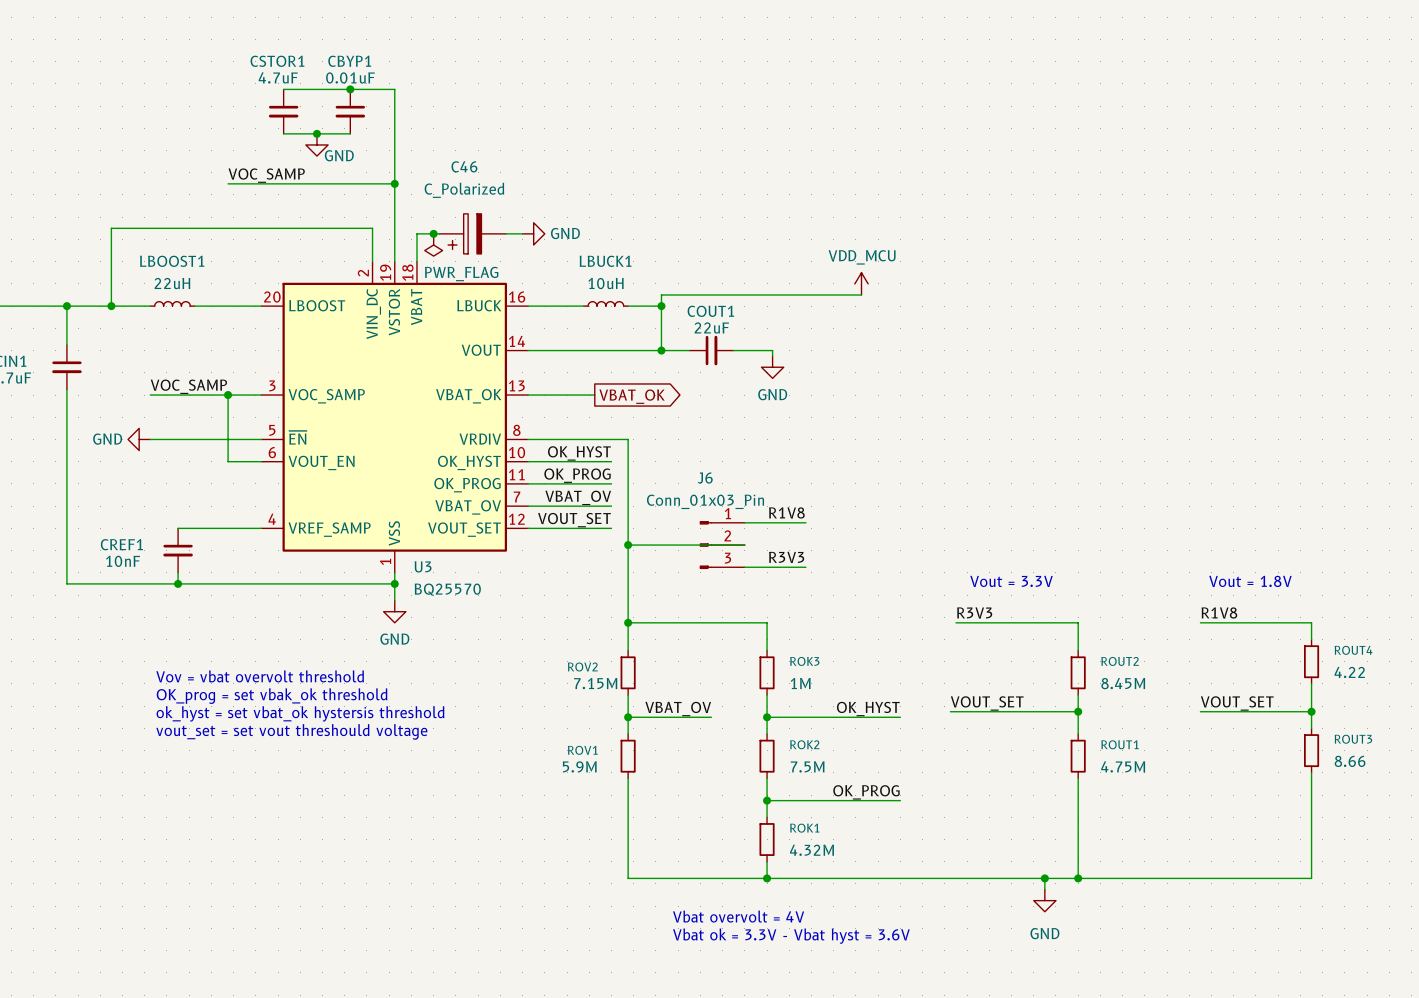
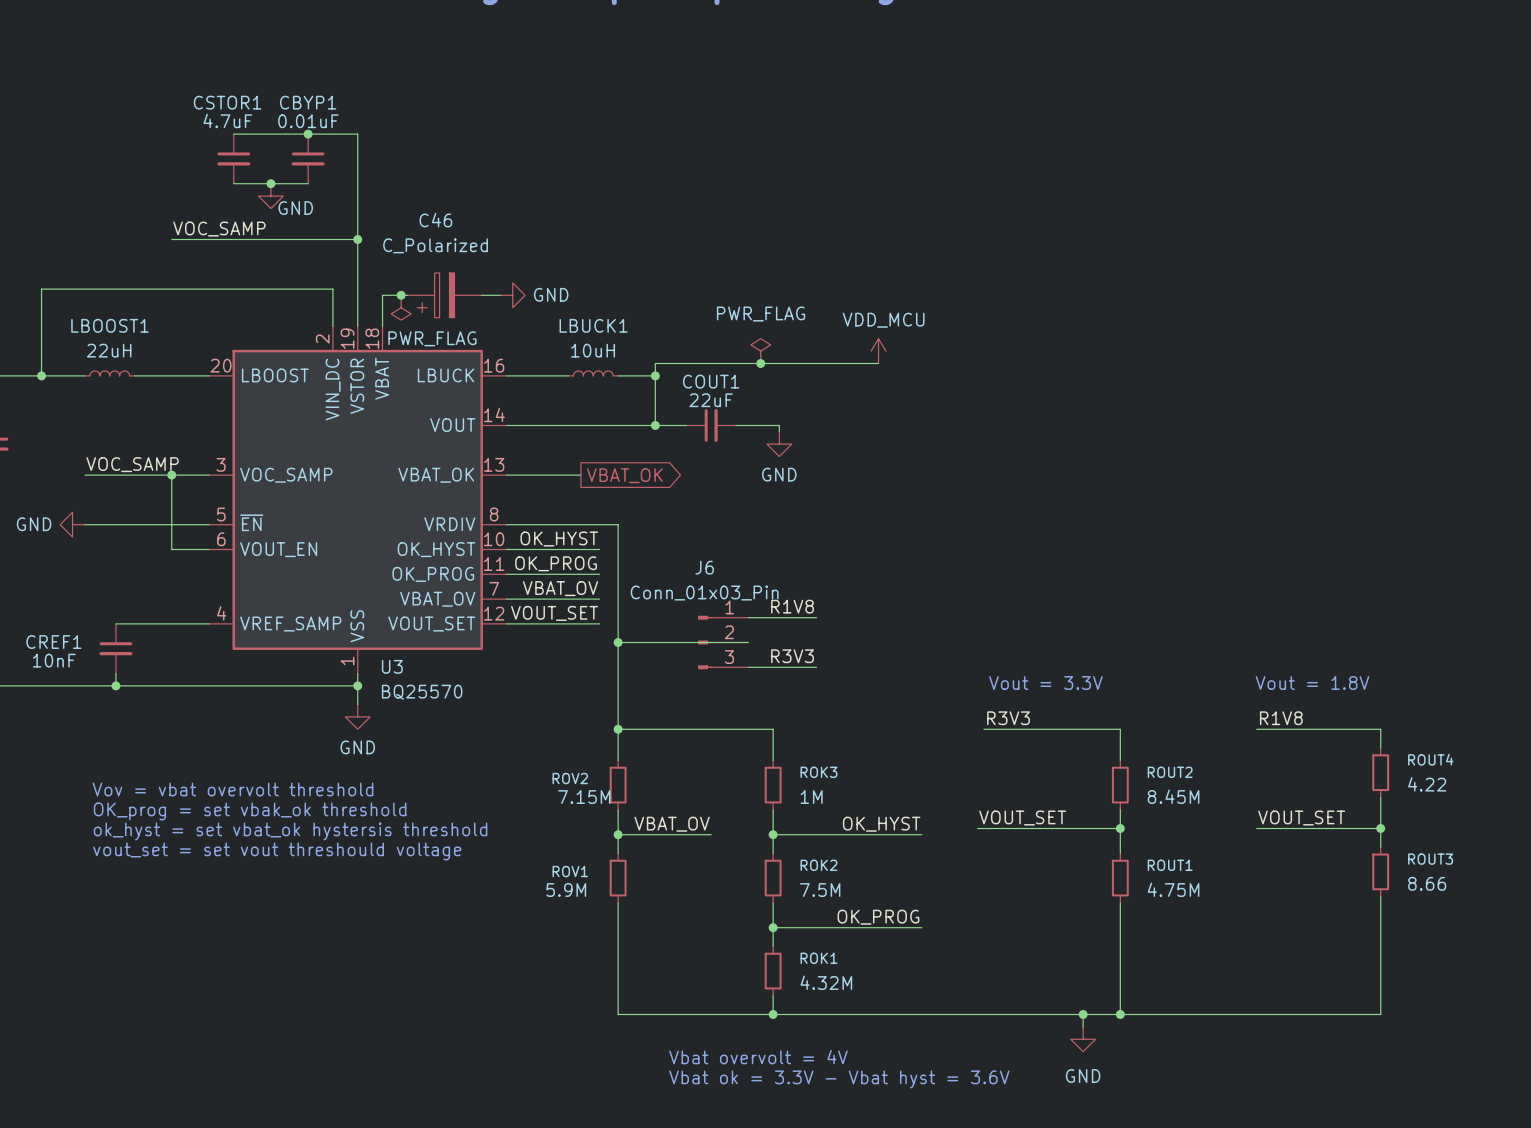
power symbol: none -> PWR_FLAG (760, 351)
junction: none -> (760, 363)

